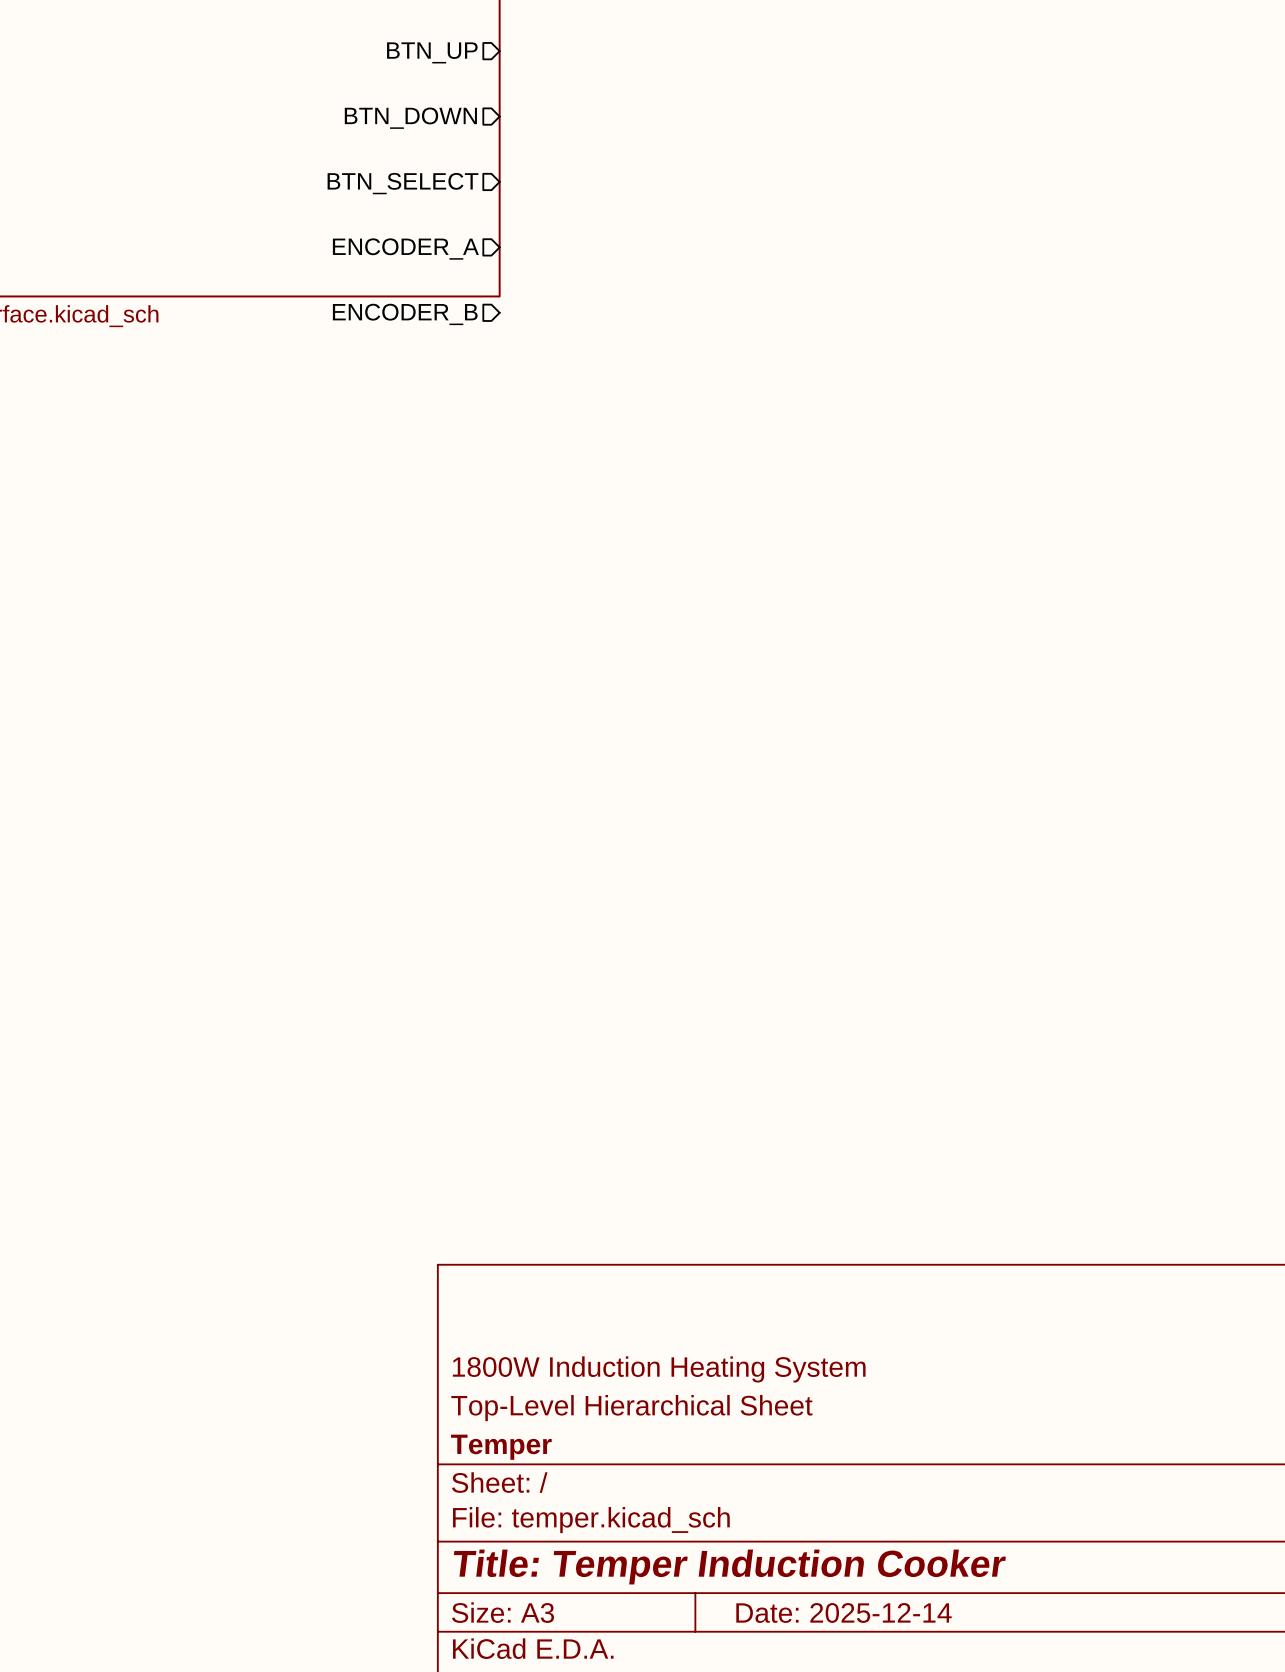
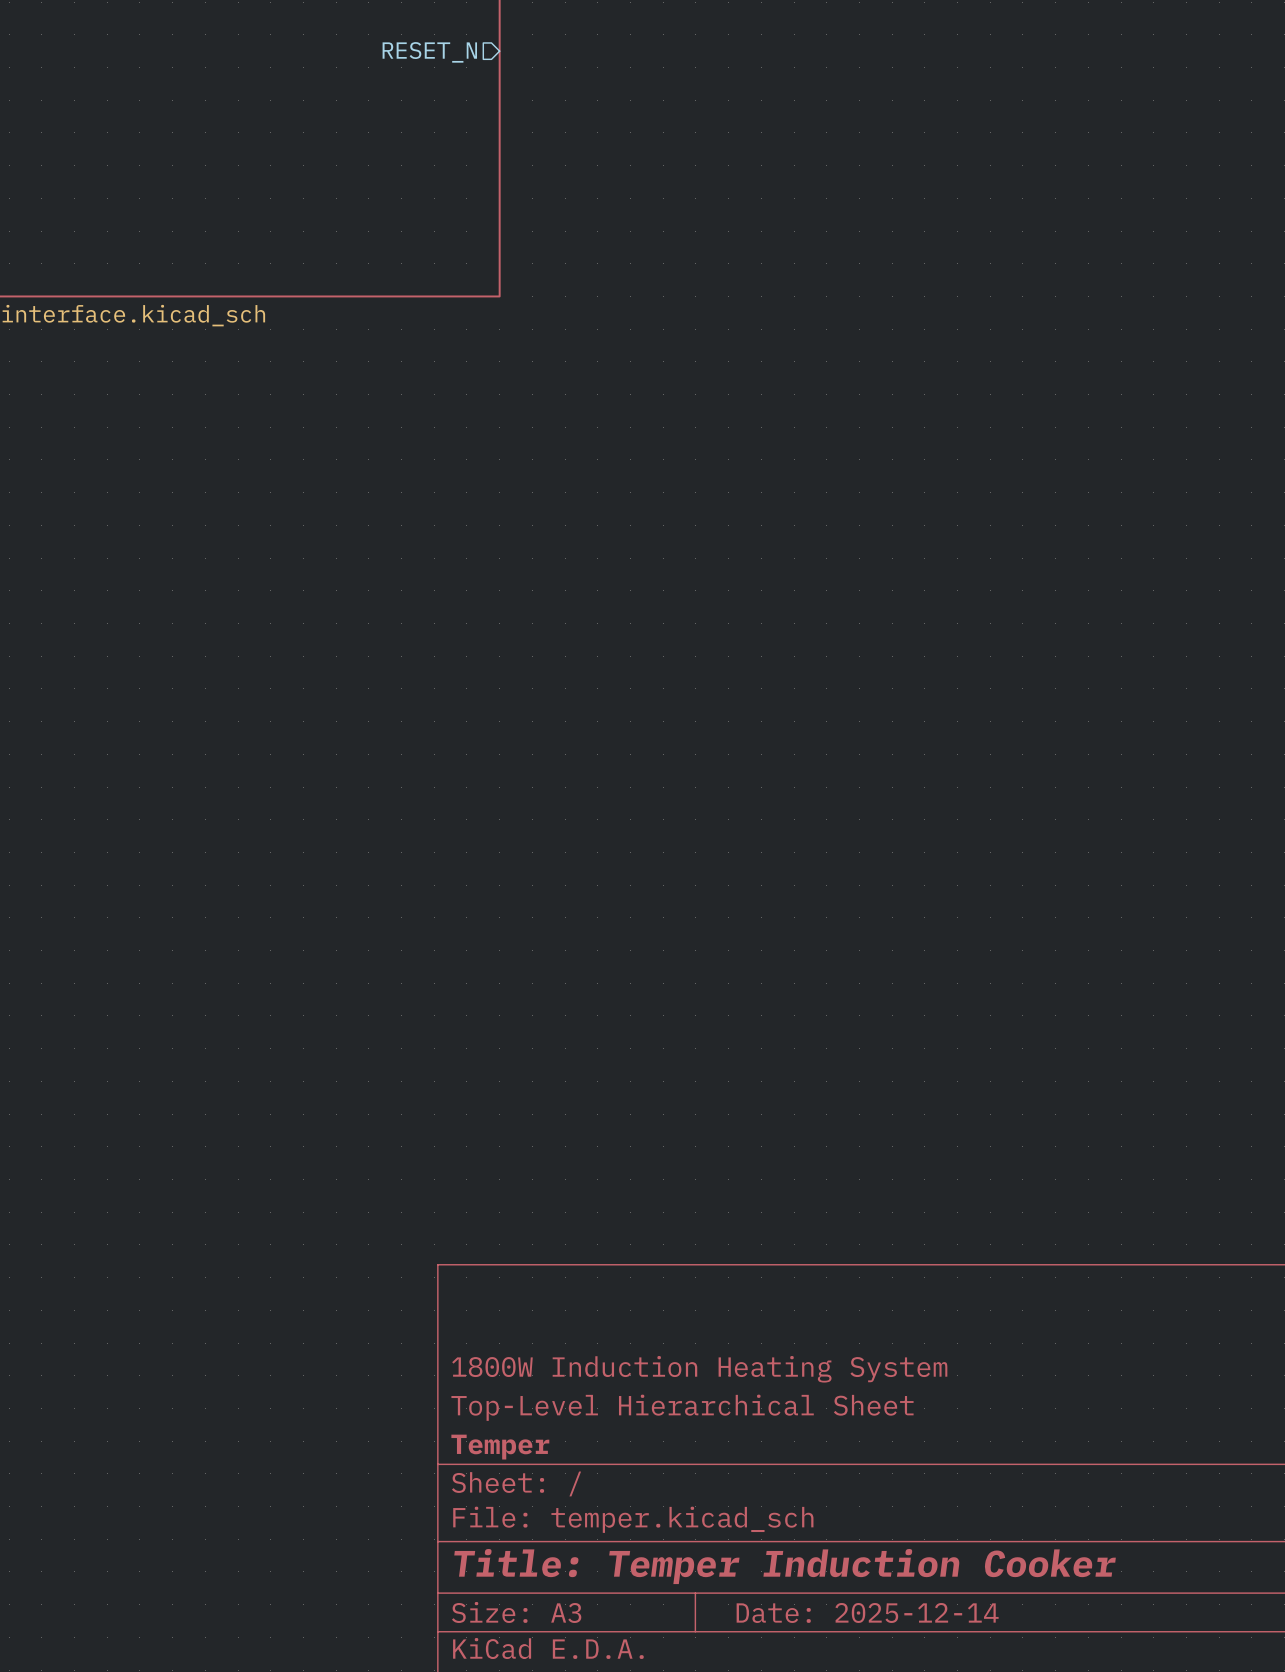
sheet pin: BTN_UP (432, 52) -> RESET_N (429, 52)
sheet pin: BTN_DOWN (410, 118) -> none
sheet pin: BTN_SELECT (402, 183) -> none
sheet pin: ENCODER_A (405, 249) -> none
sheet pin: ENCODER_B (405, 314) -> none

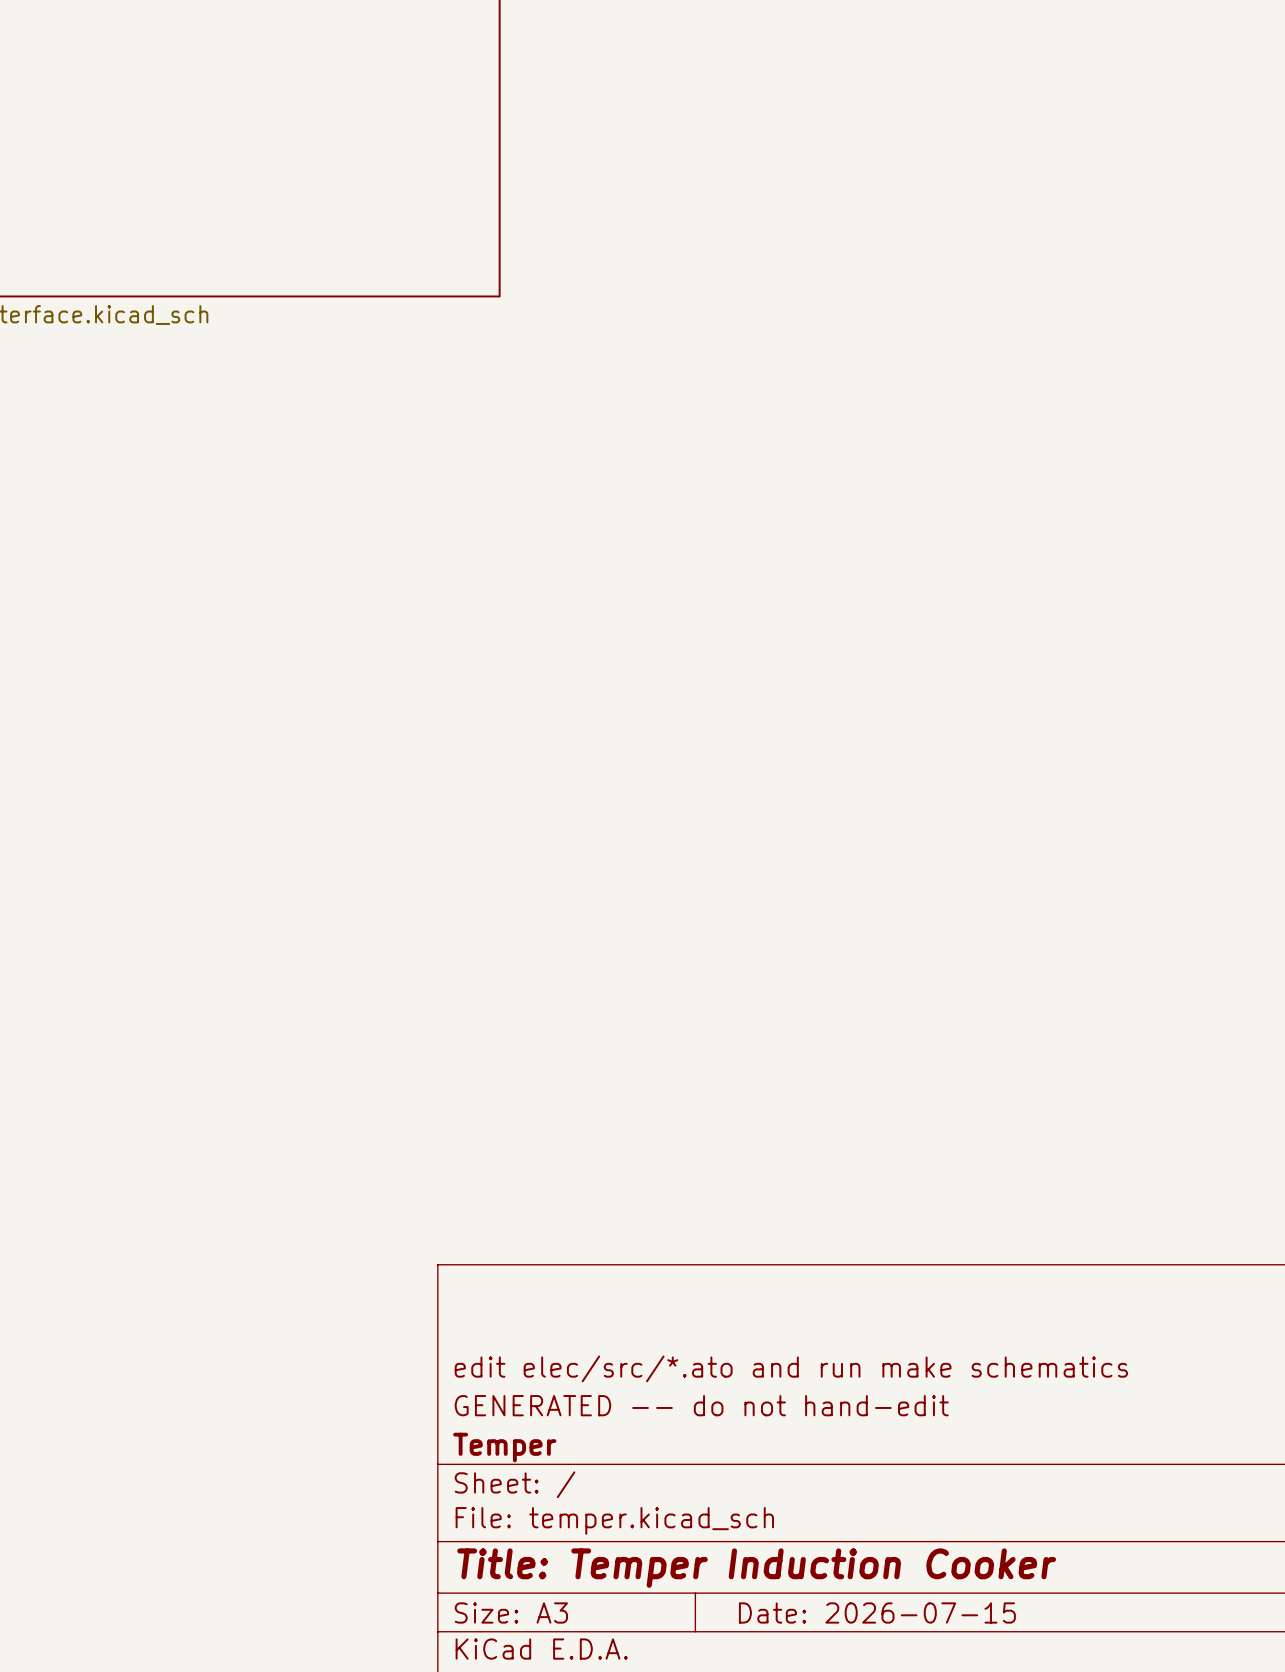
sheet pin: RESET_N (429, 52) -> none
title block: 1800W Induction Heating System (699, 1369) -> edit elec/src/*.ato and run make schematics (791, 1368)
title block: Top-Level Hierarchical Sheet (682, 1407) -> GENERATED -- do not hand-edit (701, 1405)
title block: Date: 2025-12-14 (867, 1612) -> Date: 2026-07-15 (877, 1612)

